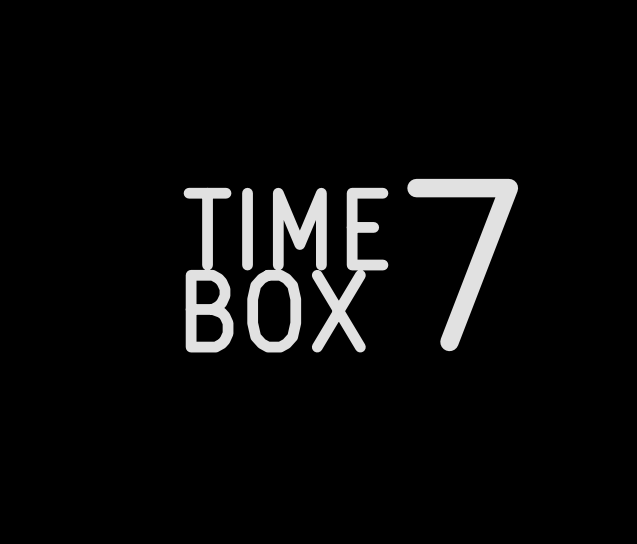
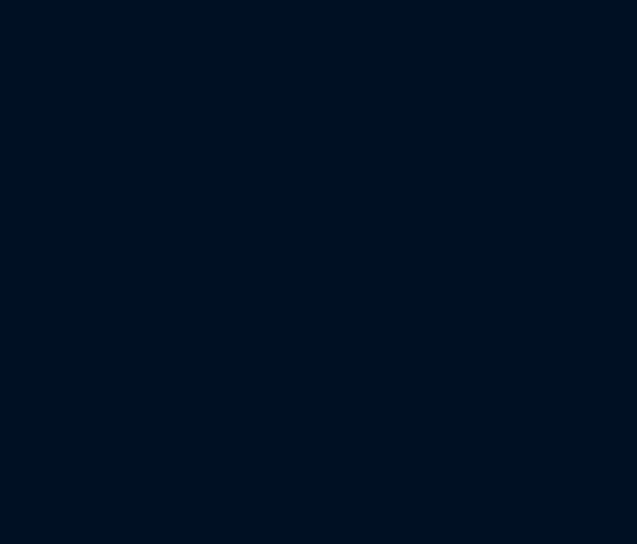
text: TIME (286, 229) -> none
text: 7 (462, 265) -> none
text: BOX (275, 311) -> none

